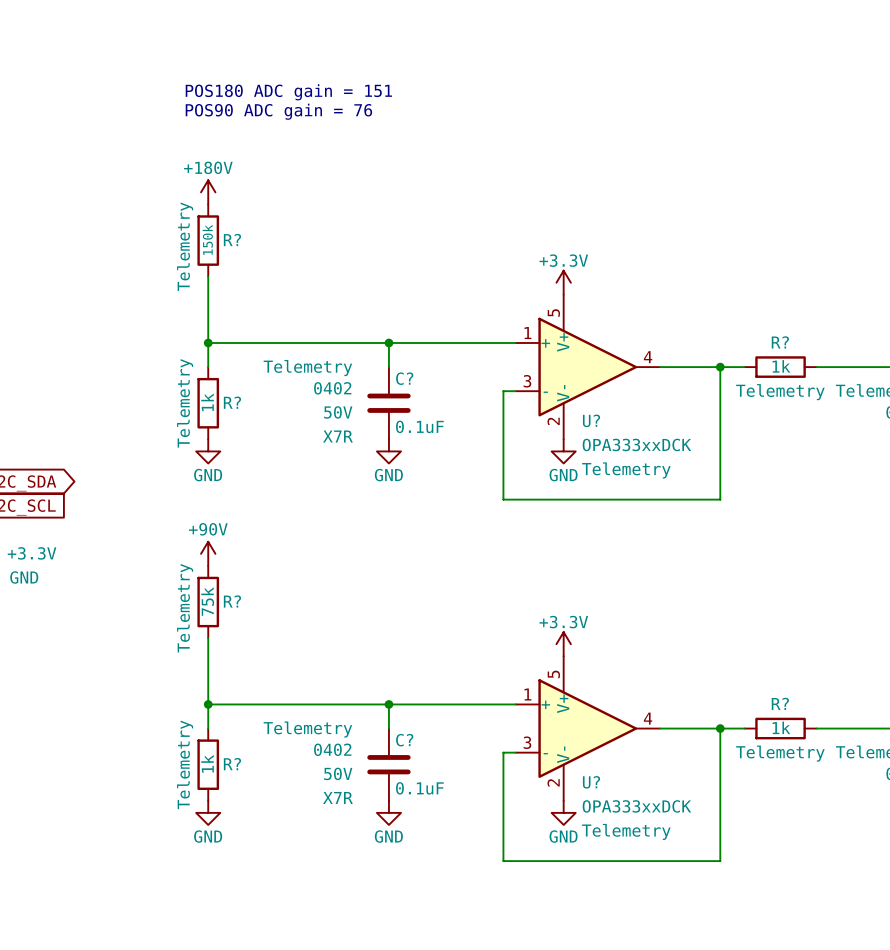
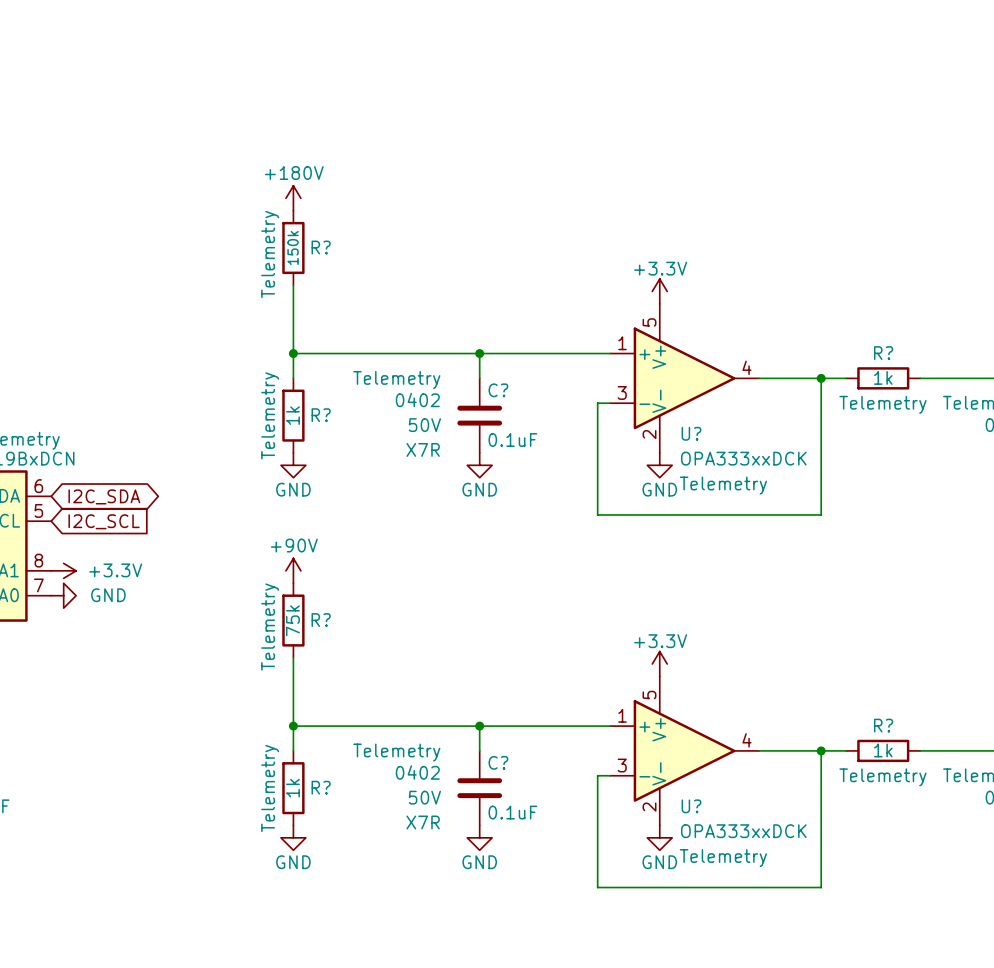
text: POS180 ADC gain = 151 (288, 92) -> none
text: POS90 ADC gain = 76 (278, 111) -> none

